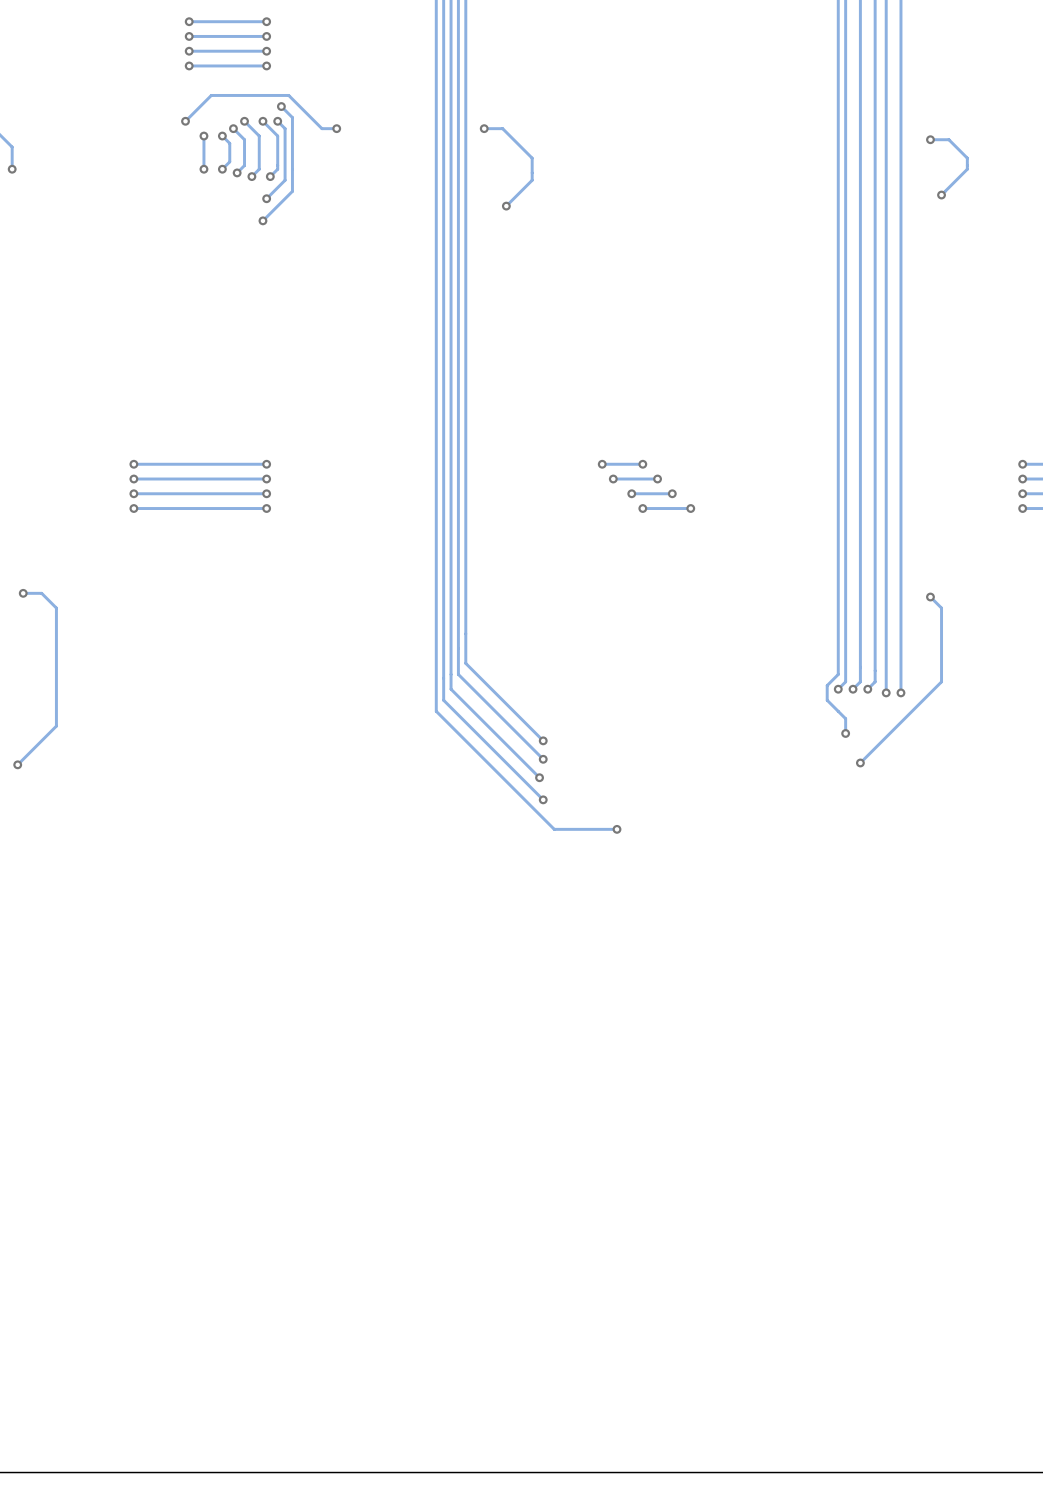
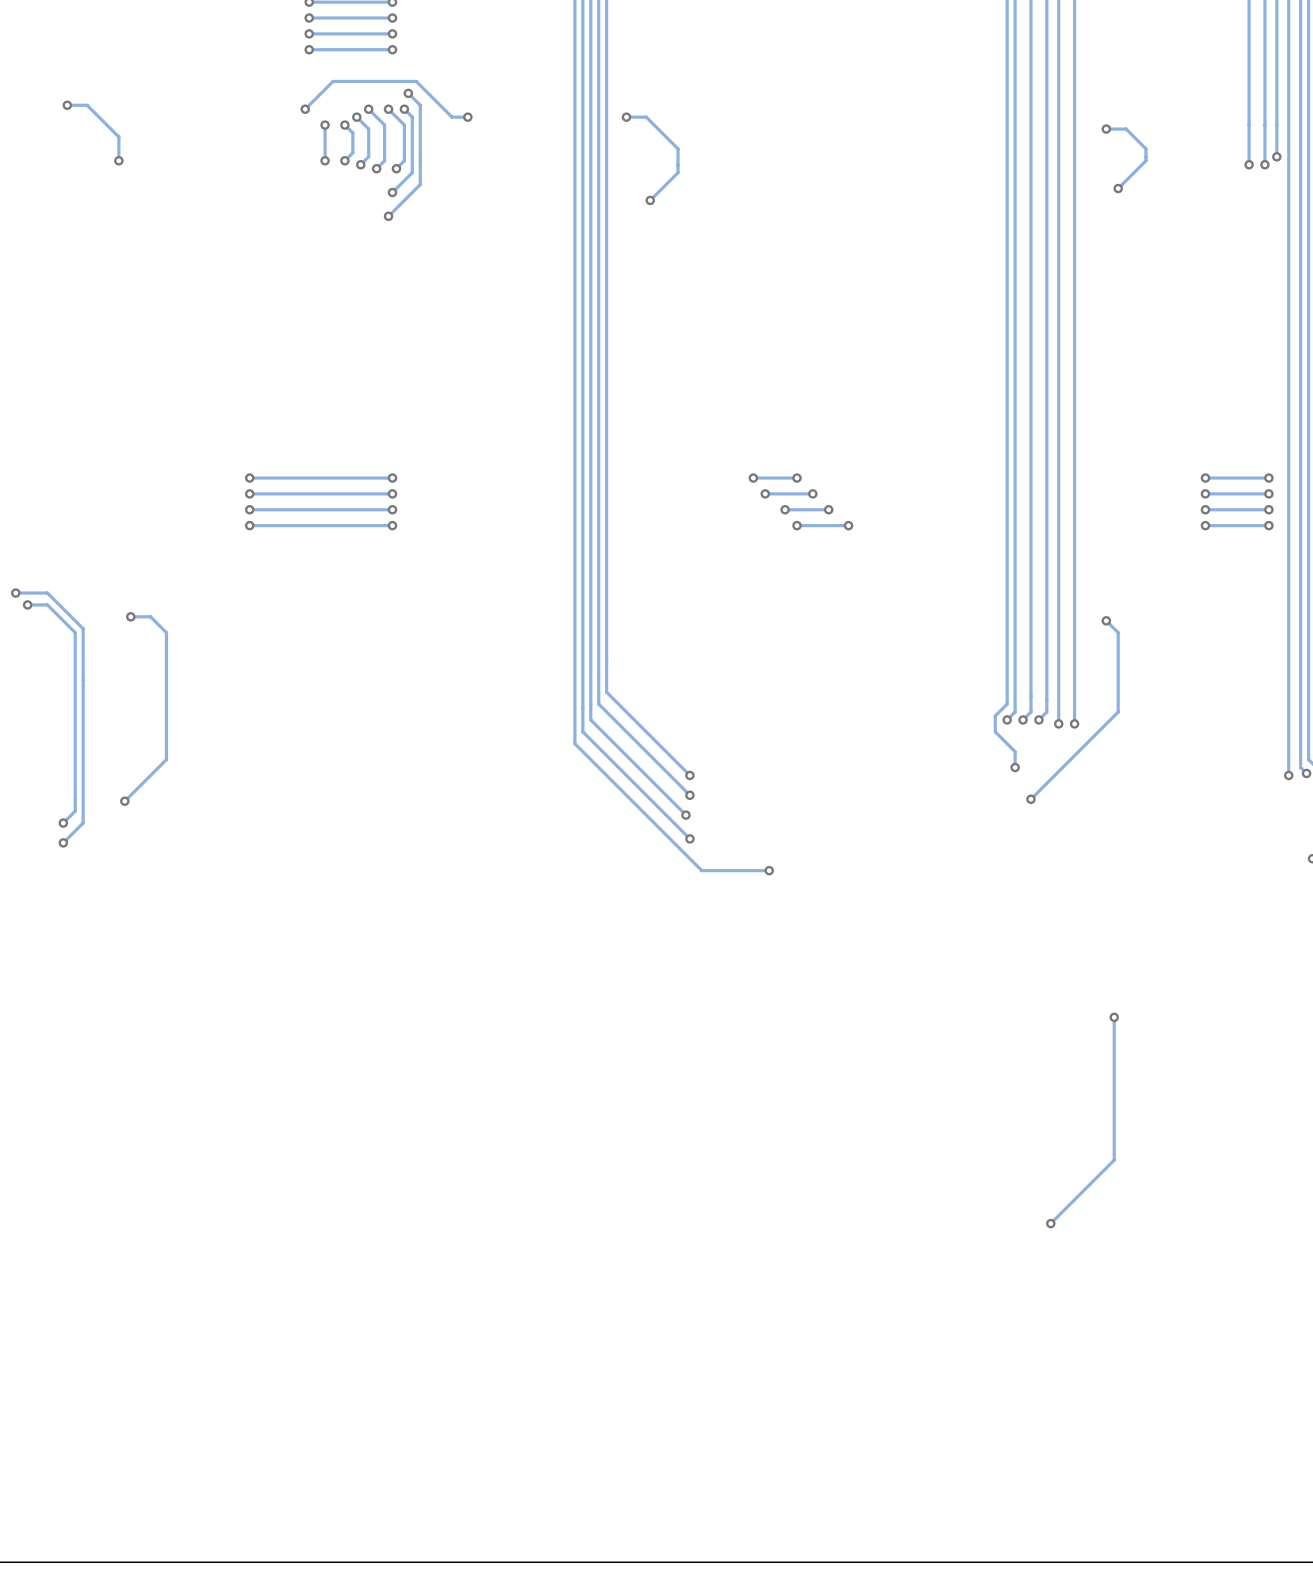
track: none -> (1114, 1017) (1114, 1160) (1050, 1223)
via: none -> (1114, 1017)
via: none -> (1050, 1223)

